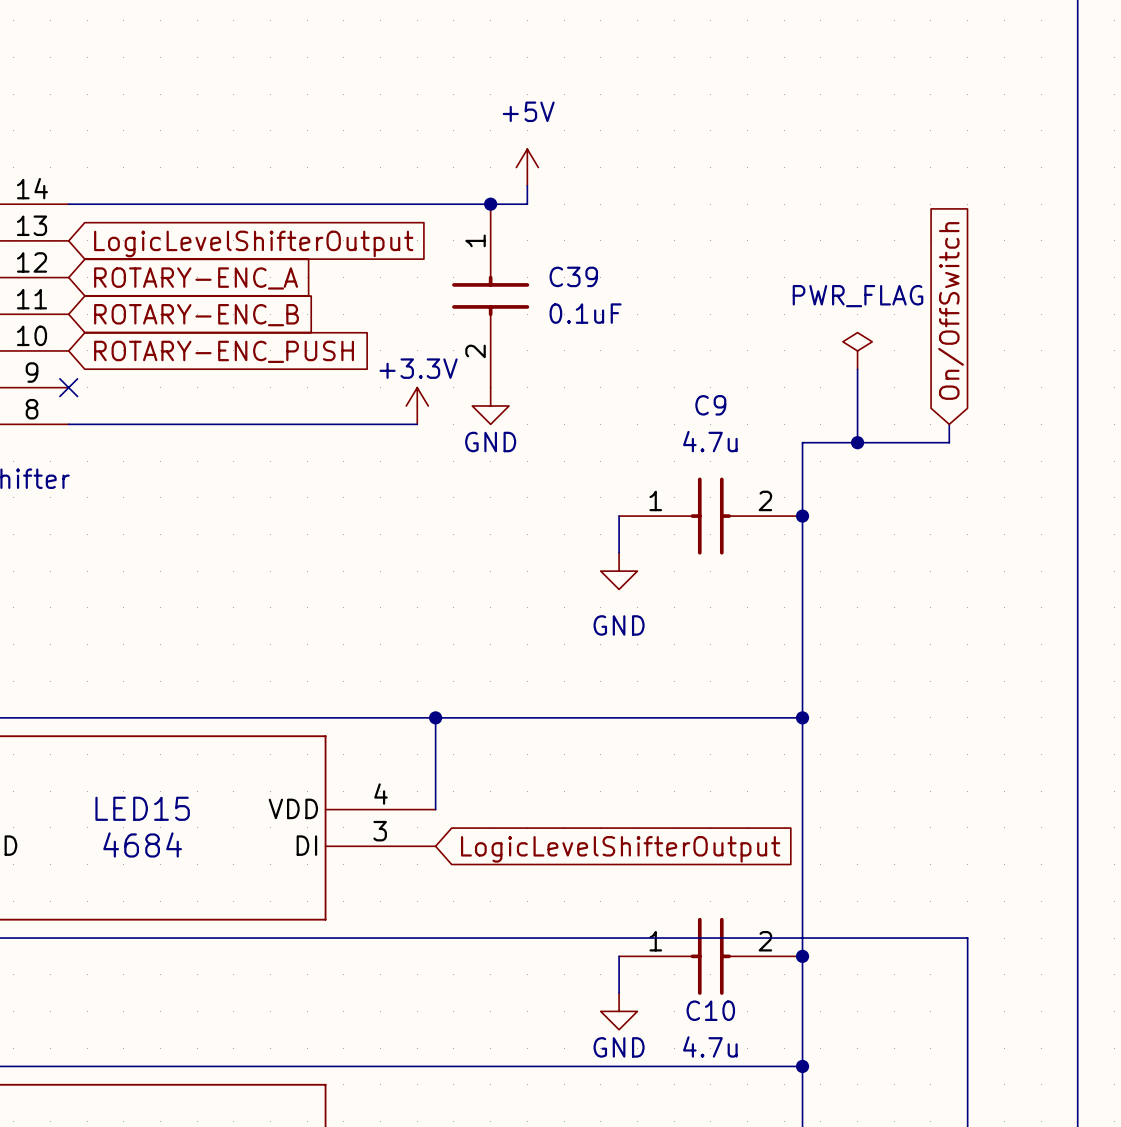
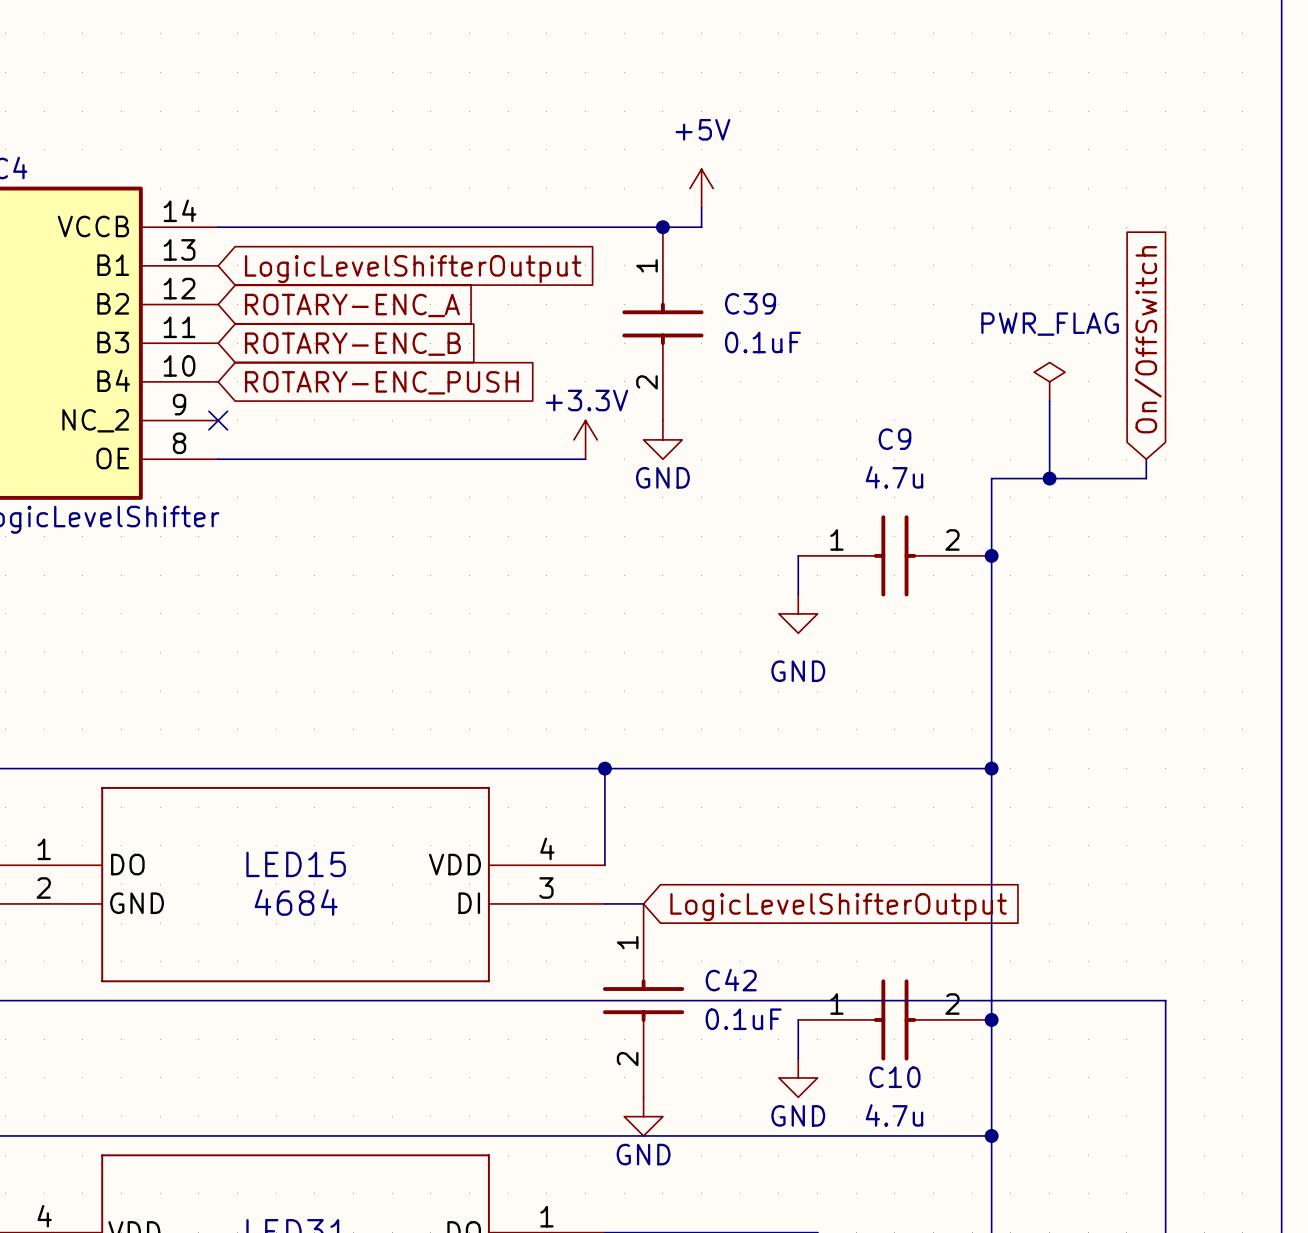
wire: none -> (604, 903) (643, 903)
global label position: LogicLevelShifterOutput (620, 849) -> LogicLevelShifterOutput (838, 907)
C42: none -> 0.1uF (643, 1000)
power symbol: none -> GND (643, 1116)

